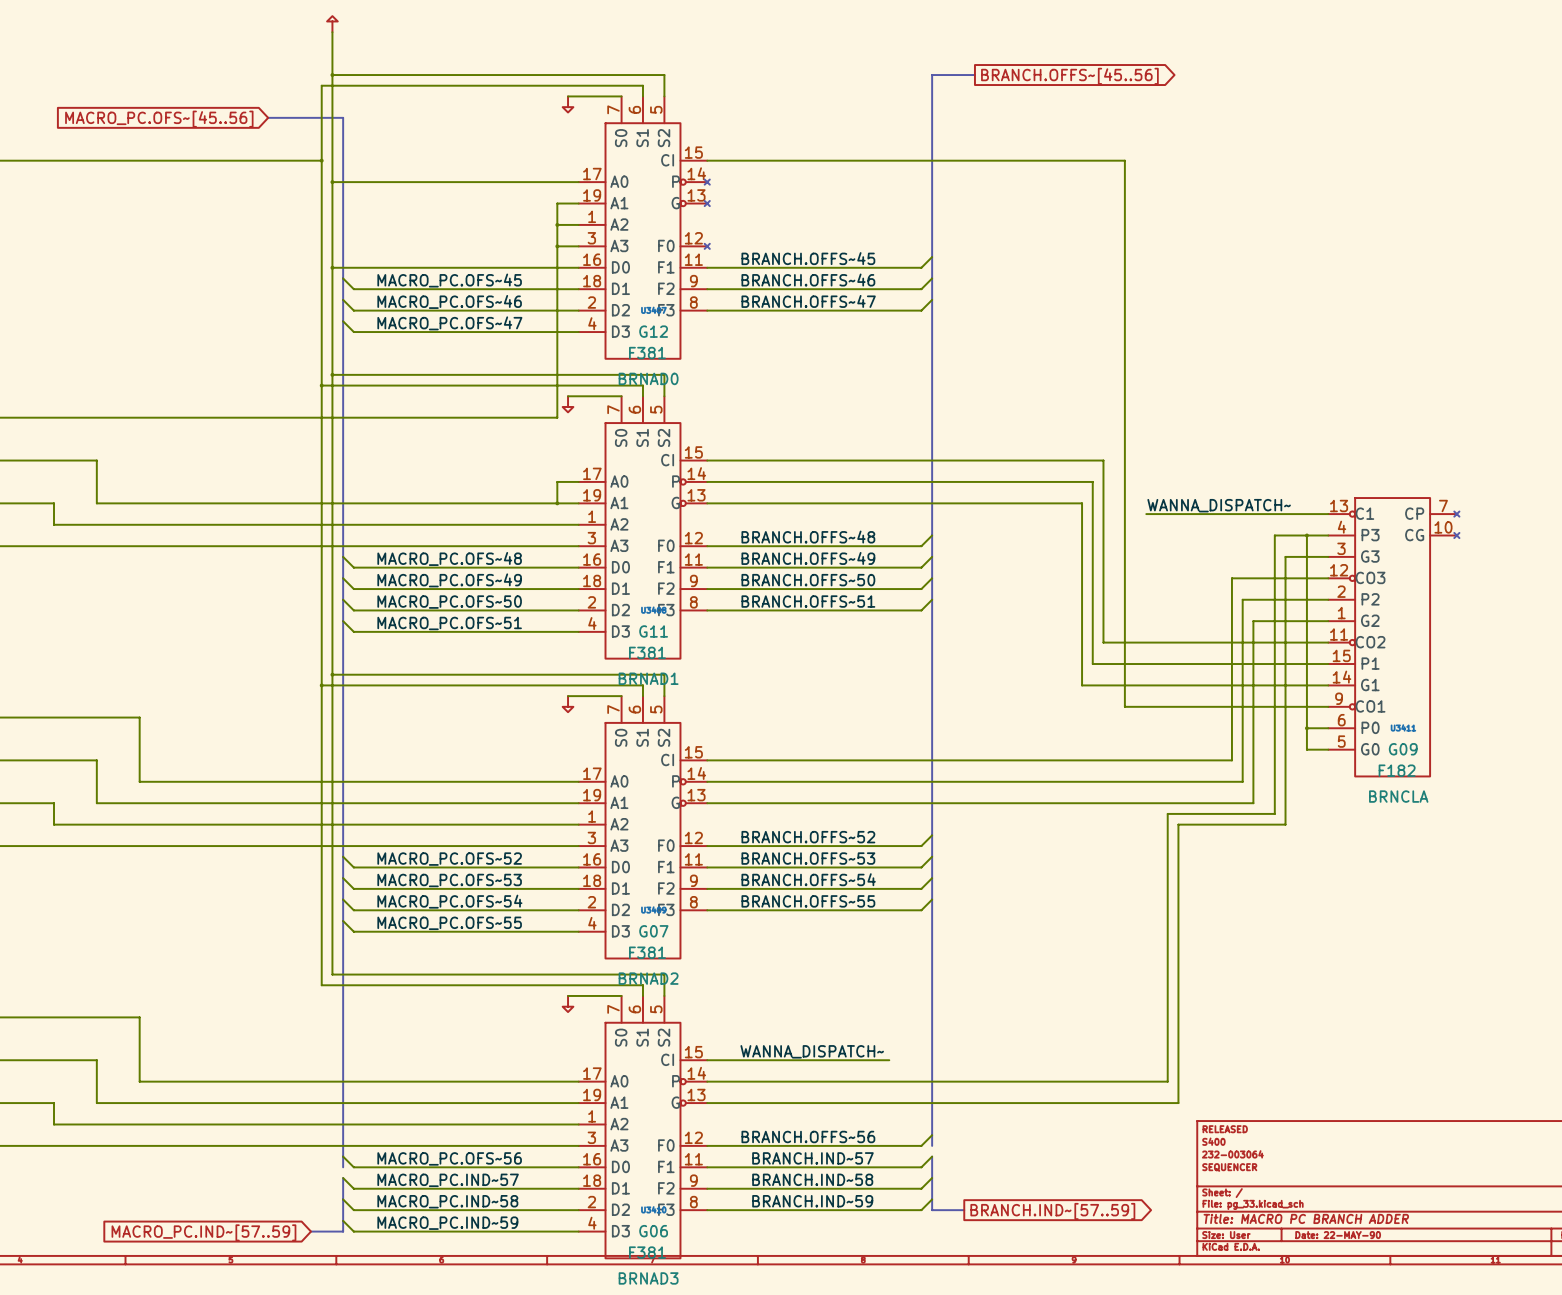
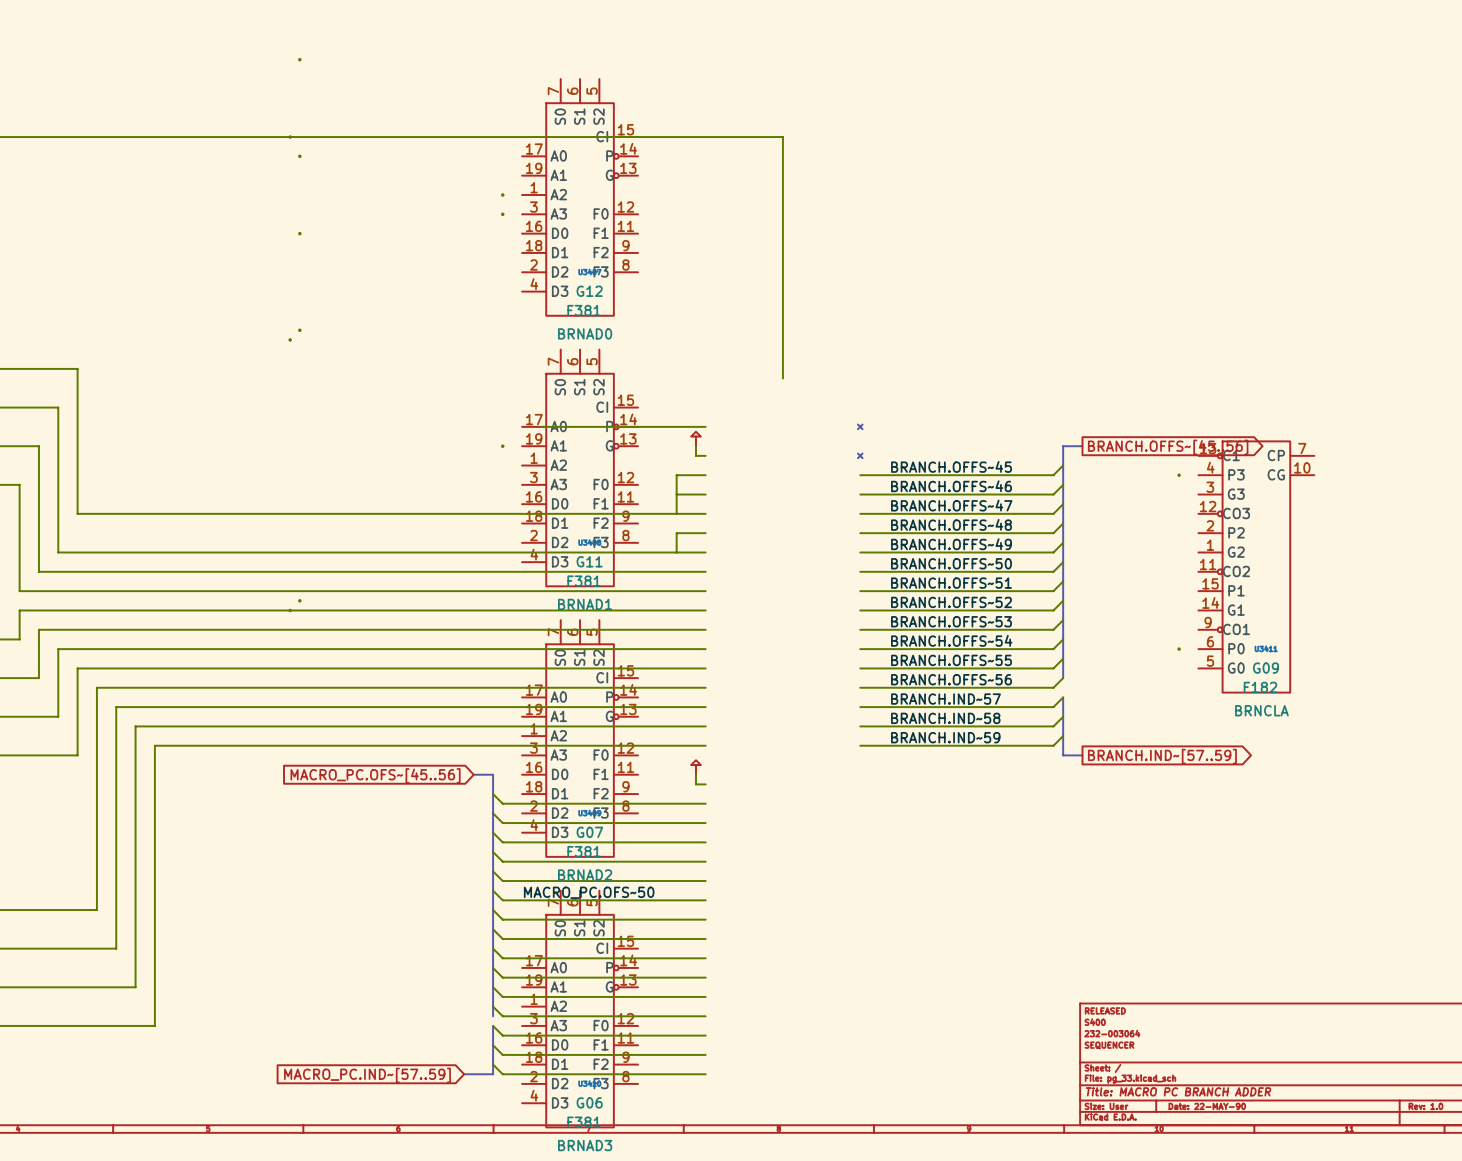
power symbol: (332, 23) -> none
wire: (332, 32) (332, 974) (664, 974) (664, 995) -> none
wire: (332, 75) (664, 75) (664, 96) -> none
bus: (974, 75) (932, 75) (932, 1145) -> none
global label: BRANCH.OFFS~[45..56] (1069, 76) -> none
wire: (568, 96) (621, 96) -> none
wire: (642, 96) (642, 85) (321, 85) (321, 985) (557, 985) -> (493, 871) (502, 881)
power symbol: (568, 104) -> none
bus: (268, 117) (343, 117) (343, 1167) -> none
global label: MACRO_PC.OFS~[45..56] (159, 119) -> none
wire: none -> (290, 137) (638, 137)
wire: (867, 160) (1124, 160) (1124, 706) -> (782, 137) (782, 378)
wire: (332, 182) (578, 182) -> none
no-connect mark: (707, 182) -> none
wire: (578, 203) (557, 203) (557, 417) (86, 417) -> (705, 513) (77, 513) (77, 368)
no-connect mark: (707, 203) -> none
wire: (557, 224) (578, 224) -> none
wire: (557, 246) (578, 246) -> none
no-connect mark: (707, 246) -> none
wire: (932, 257) (921, 267) (707, 267) -> none
label: BRANCH.OFFS~45 (808, 258) -> none
wire: (332, 267) (578, 267) -> none
wire: (343, 278) (353, 289) (578, 289) -> none
wire: (932, 278) (921, 289) (707, 289) -> none
label: MACRO_PC.OFS~45 (449, 280) -> none
label: BRANCH.OFFS~46 (808, 280) -> none
wire: (343, 299) (353, 310) (578, 310) -> none
wire: (932, 299) (921, 310) (707, 310) -> none
label: MACRO_PC.OFS~46 (449, 301) -> none
label: BRANCH.OFFS~47 (808, 301) -> none
wire: (343, 321) (353, 332) (578, 332) -> none
label: MACRO_PC.OFS~47 (449, 323) -> none
wire: (332, 374) (664, 374) (664, 396) -> none
wire: (321, 385) (642, 385) (642, 396) -> none
wire: (568, 396) (621, 396) -> none
power symbol: (568, 404) -> none
wire: (64, 460) (96, 460) (96, 503) (578, 503) -> (58, 407) (58, 552) (705, 552)
wire: (707, 460) (1103, 460) (1103, 642) -> (860, 571) (995, 571)
wire: (578, 481) (557, 481) (557, 503) -> none
wire: none -> (541, 426) (638, 426)
wire: (782, 481) (1092, 481) (1092, 664) -> (860, 591) (985, 591)
no-connect mark: none -> (860, 426)
power symbol: none -> (695, 438)
wire: (43, 503) (54, 503) (54, 524) (578, 524) -> (38, 446) (38, 571) (705, 571)
wire: (707, 503) (1082, 503) (1082, 685) -> (860, 610) (976, 610)
wire: none -> (695, 446) (695, 455) (705, 455)
bus: none -> (1082, 446) (1063, 446) (1063, 678)
global label: none -> BRANCH.OFFS~[45..56] (1168, 447)
label: WANNA_DISPATCH~ (1219, 505) -> none
no-connect mark: none -> (860, 455)
wire: (1146, 514) (1328, 514) -> none
no-connect mark: (1456, 514) -> none
wire: none -> (1063, 465) (1053, 475) (860, 475)
label: none -> BRANCH.OFFS~45 (951, 466)
wire: none -> (705, 475) (676, 475) (676, 513)
wire: (932, 535) (921, 546) (707, 546) -> none
wire: (1306, 535) (1306, 749) (1328, 749) -> none
wire: (1328, 535) (1274, 535) (1274, 813) (1167, 813) (1167, 1081) (707, 1081) -> none
no-connect mark: (1456, 535) -> none
label: BRANCH.OFFS~48 (808, 537) -> none
wire: (21, 546) (578, 546) -> (19, 484) (19, 591) (705, 591)
wire: none -> (1063, 484) (1053, 494) (860, 494)
label: none -> BRANCH.OFFS~46 (951, 486)
wire: (343, 556) (353, 567) (578, 567) -> none
wire: none -> (676, 494) (705, 494)
wire: (932, 556) (921, 567) (707, 567) -> none
wire: (1328, 556) (1285, 556) (1285, 824) (1178, 824) (1178, 1103) (707, 1103) -> none
label: MACRO_PC.OFS~48 (449, 558) -> none
label: BRANCH.OFFS~49 (808, 558) -> none
wire: none -> (1063, 504) (1053, 513) (860, 513)
label: none -> BRANCH.OFFS~47 (951, 505)
wire: (343, 578) (353, 589) (578, 589) -> none
wire: (932, 578) (921, 589) (707, 589) -> none
wire: (1328, 578) (1231, 578) (1231, 760) (707, 760) -> none
label: MACRO_PC.OFS~49 (449, 580) -> none
label: BRANCH.OFFS~50 (808, 580) -> none
wire: none -> (1063, 523) (1053, 533) (860, 533)
label: none -> BRANCH.OFFS~48 (951, 524)
wire: (343, 599) (353, 610) (578, 610) -> none
wire: none -> (705, 533) (676, 533) (676, 552)
wire: (932, 599) (921, 610) (707, 610) -> none
wire: (1328, 599) (1242, 599) (1242, 781) (707, 781) -> none
label: BRANCH.OFFS~51 (808, 601) -> none
label: MACRO_PC.OFS~50 (449, 602) -> none
wire: none -> (1063, 542) (1053, 552) (860, 552)
label: none -> BRANCH.OFFS~49 (951, 544)
wire: (343, 621) (353, 631) (578, 631) -> none
wire: (1328, 621) (1253, 621) (1253, 803) (707, 803) -> none
label: MACRO_PC.OFS~51 (449, 623) -> none
label: none -> BRANCH.OFFS~50 (951, 563)
wire: (1167, 642) (1328, 642) -> (1053, 571) (1063, 562)
label: none -> BRANCH.OFFS~51 (951, 583)
wire: (1167, 664) (1328, 664) -> (1053, 591) (1063, 581)
wire: (332, 674) (664, 674) (664, 696) -> none
label: none -> BRANCH.OFFS~52 (951, 602)
wire: (642, 685) (642, 696) -> (580, 610) (705, 610)
wire: (1167, 685) (1328, 685) -> (1053, 610) (1063, 600)
wire: (568, 696) (621, 696) -> none
label: none -> BRANCH.OFFS~53 (951, 621)
power symbol: (568, 704) -> none
wire: none -> (860, 629) (1014, 629)
wire: (1167, 706) (1328, 706) -> (1053, 629) (1063, 620)
wire: (21, 717) (139, 717) (139, 781) (578, 781) -> (19, 639) (19, 610) (290, 610)
wire: none -> (1063, 639) (1053, 649) (860, 649)
label: none -> BRANCH.OFFS~54 (951, 640)
wire: (1306, 728) (1328, 728) -> none
wire: none -> (1063, 658) (1053, 668) (860, 668)
label: none -> BRANCH.OFFS~55 (951, 660)
wire: (43, 760) (96, 760) (96, 803) (578, 803) -> (38, 678) (38, 629) (705, 629)
wire: none -> (1063, 678) (1053, 687) (860, 687)
label: none -> BRANCH.OFFS~56 (951, 679)
bus: none -> (1063, 697) (1063, 755) (1082, 755)
wire: none -> (1063, 697) (1053, 707) (860, 707)
label: none -> BRANCH.IND~57 (945, 699)
wire: none -> (705, 707) (116, 707) (116, 948) (87, 948)
wire: (54, 803) (54, 824) (578, 824) -> (48, 716) (58, 716) (58, 649) (705, 649)
wire: none -> (1063, 716) (1053, 726) (860, 726)
label: none -> BRANCH.IND~58 (945, 718)
wire: none -> (1063, 736) (1053, 745) (860, 745)
label: none -> BRANCH.IND~59 (945, 737)
wire: (932, 835) (921, 846) (707, 846) -> none
label: BRANCH.OFFS~52 (808, 837) -> none
wire: (86, 846) (578, 846) -> (77, 755) (77, 668) (705, 668)
global label: none -> BRANCH.IND~[57..59] (1162, 756)
wire: (343, 856) (353, 867) (578, 867) -> none
wire: (932, 856) (921, 867) (707, 867) -> none
label: BRANCH.OFFS~53 (808, 858) -> none
label: MACRO_PC.OFS~52 (449, 859) -> none
power symbol: none -> (695, 767)
bus: none -> (473, 774) (493, 774) (493, 1016)
wire: none -> (695, 774) (695, 784) (705, 784)
global label: none -> MACRO_PC.OFS~[45..56] (375, 775)
wire: (343, 878) (353, 888) (578, 888) -> none
wire: (932, 878) (921, 888) (707, 888) -> none
label: BRANCH.OFFS~54 (808, 879) -> none
label: MACRO_PC.OFS~53 (449, 880) -> none
wire: none -> (493, 794) (502, 803) (705, 803)
wire: (343, 899) (353, 910) (578, 910) -> none
wire: (932, 899) (921, 910) (707, 910) -> none
label: MACRO_PC.OFS~54 (449, 901) -> none
label: BRANCH.OFFS~55 (808, 901) -> none
wire: none -> (493, 813) (502, 823) (705, 823)
wire: (343, 921) (353, 931) (578, 931) -> none
label: MACRO_PC.OFS~55 (449, 923) -> none
wire: none -> (493, 832) (502, 842) (705, 842)
wire: none -> (493, 852) (502, 861) (705, 861)
wire: (642, 985) (642, 995) -> (580, 881) (705, 881)
wire: none -> (493, 890) (502, 900) (705, 900)
wire: (568, 995) (621, 995) -> none
label: none -> MACRO_PC.OFS~50 (589, 892)
power symbol: (568, 1004) -> none
wire: (107, 1017) (139, 1017) (139, 1081) (578, 1081) -> (96, 910) (96, 687) (705, 687)
wire: none -> (493, 910) (502, 919) (705, 919)
wire: none -> (493, 929) (502, 938) (705, 938)
label: WANNA_DISPATCH~ (812, 1051) -> none
wire: (96, 1060) (96, 1103) -> (48, 987) (87, 987)
wire: none -> (493, 948) (502, 958) (705, 958)
wire: (707, 1060) (889, 1060) -> none
wire: none -> (493, 967) (502, 977) (705, 977)
wire: (54, 1103) (54, 1124) (578, 1124) -> none
wire: (150, 1103) (578, 1103) -> (135, 987) (135, 726) (705, 726)
wire: none -> (493, 987) (502, 996) (705, 996)
wire: none -> (493, 1006) (502, 1016) (705, 1016)
wire: (932, 1135) (921, 1145) (707, 1145) -> none
label: BRANCH.OFFS~56 (808, 1136) -> none
wire: (171, 1145) (578, 1145) -> (154, 1025) (154, 745) (705, 745)
bus: none -> (493, 1025) (493, 1074) (464, 1074)
wire: none -> (493, 1025) (502, 1035) (705, 1035)
wire: (343, 1156) (353, 1167) (578, 1167) -> none
bus: (932, 1156) (932, 1210) (964, 1210) -> none
wire: (932, 1156) (921, 1167) (707, 1167) -> none
label: MACRO_PC.OFS~56 (449, 1158) -> none
label: BRANCH.IND~57 (812, 1158) -> none
wire: none -> (493, 1045) (502, 1054) (705, 1054)
bus: (343, 1178) (343, 1231) (311, 1231) -> none
wire: (343, 1178) (353, 1188) (578, 1188) -> none
wire: (932, 1178) (921, 1188) (707, 1188) -> none
label: BRANCH.IND~58 (812, 1179) -> none
label: MACRO_PC.IND~57 (448, 1180) -> none
wire: none -> (493, 1064) (502, 1074) (705, 1074)
wire: (343, 1199) (353, 1210) (578, 1210) -> none
wire: (932, 1199) (921, 1210) (707, 1210) -> none
global label: none -> MACRO_PC.IND~[57..59] (367, 1075)
label: MACRO_PC.IND~58 (447, 1201) -> none
label: BRANCH.IND~59 (812, 1201) -> none
global label: BRANCH.IND~[57..59] (1052, 1211) -> none
wire: (343, 1220) (353, 1231) (578, 1231) -> none
label: MACRO_PC.IND~59 (447, 1223) -> none
global label: MACRO_PC.IND~[57..59] (203, 1232) -> none

